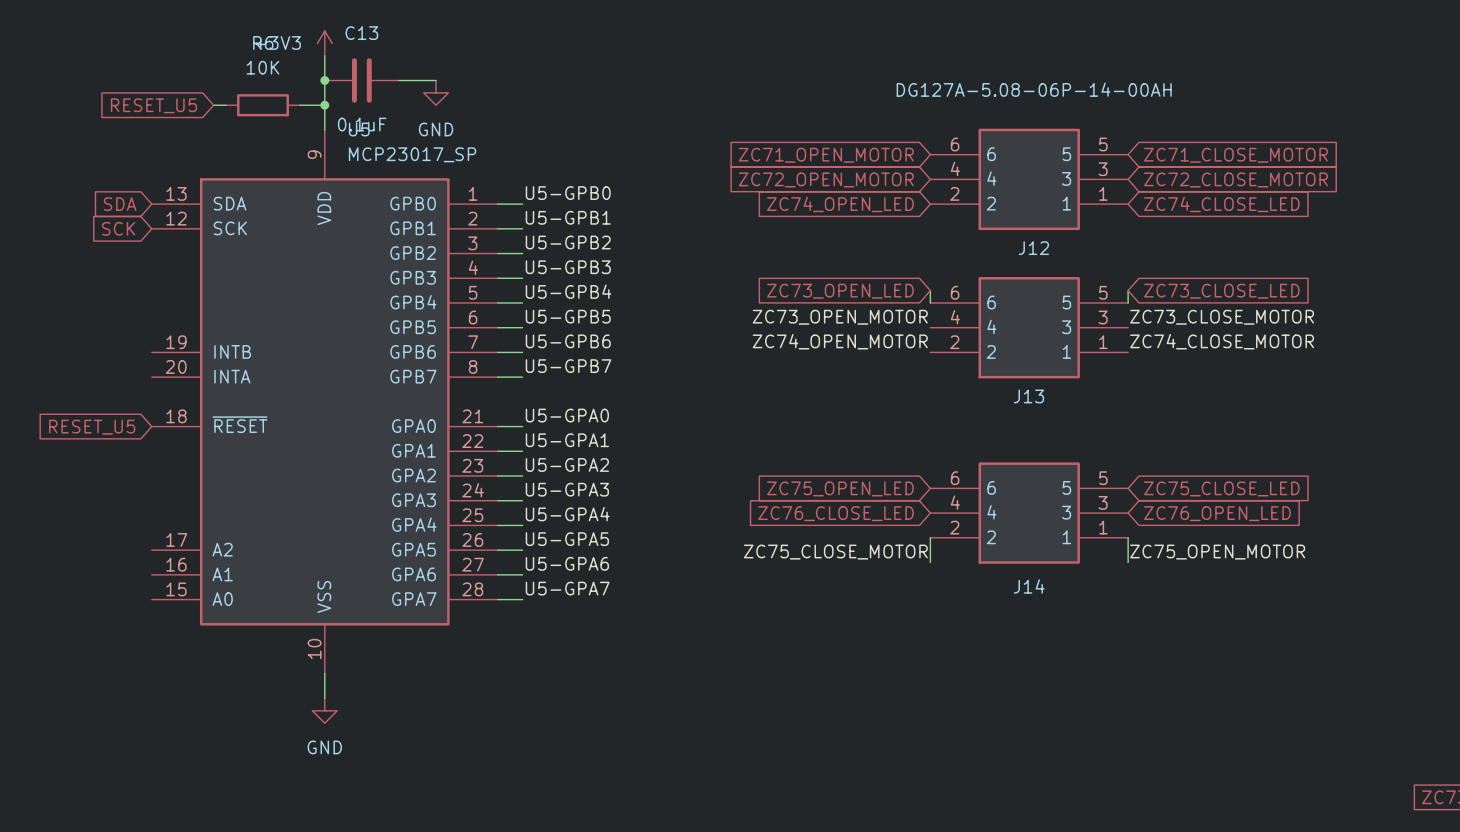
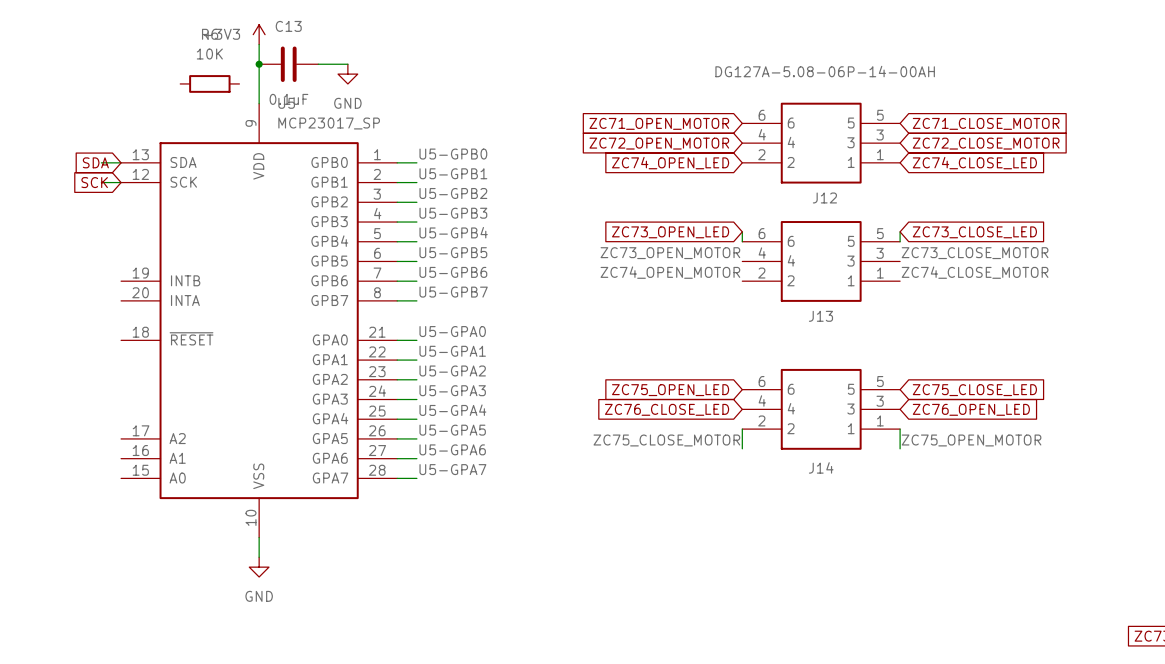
global label: RESET_U5 (153, 105) -> none
wire: (213, 105) (225, 105) -> none
wire: (300, 105) (324, 105) -> (101, 162) (121, 162)
junction: (324, 105) -> none
wire: none -> (101, 182) (121, 182)
global label: RESET_U5 (92, 427) -> none

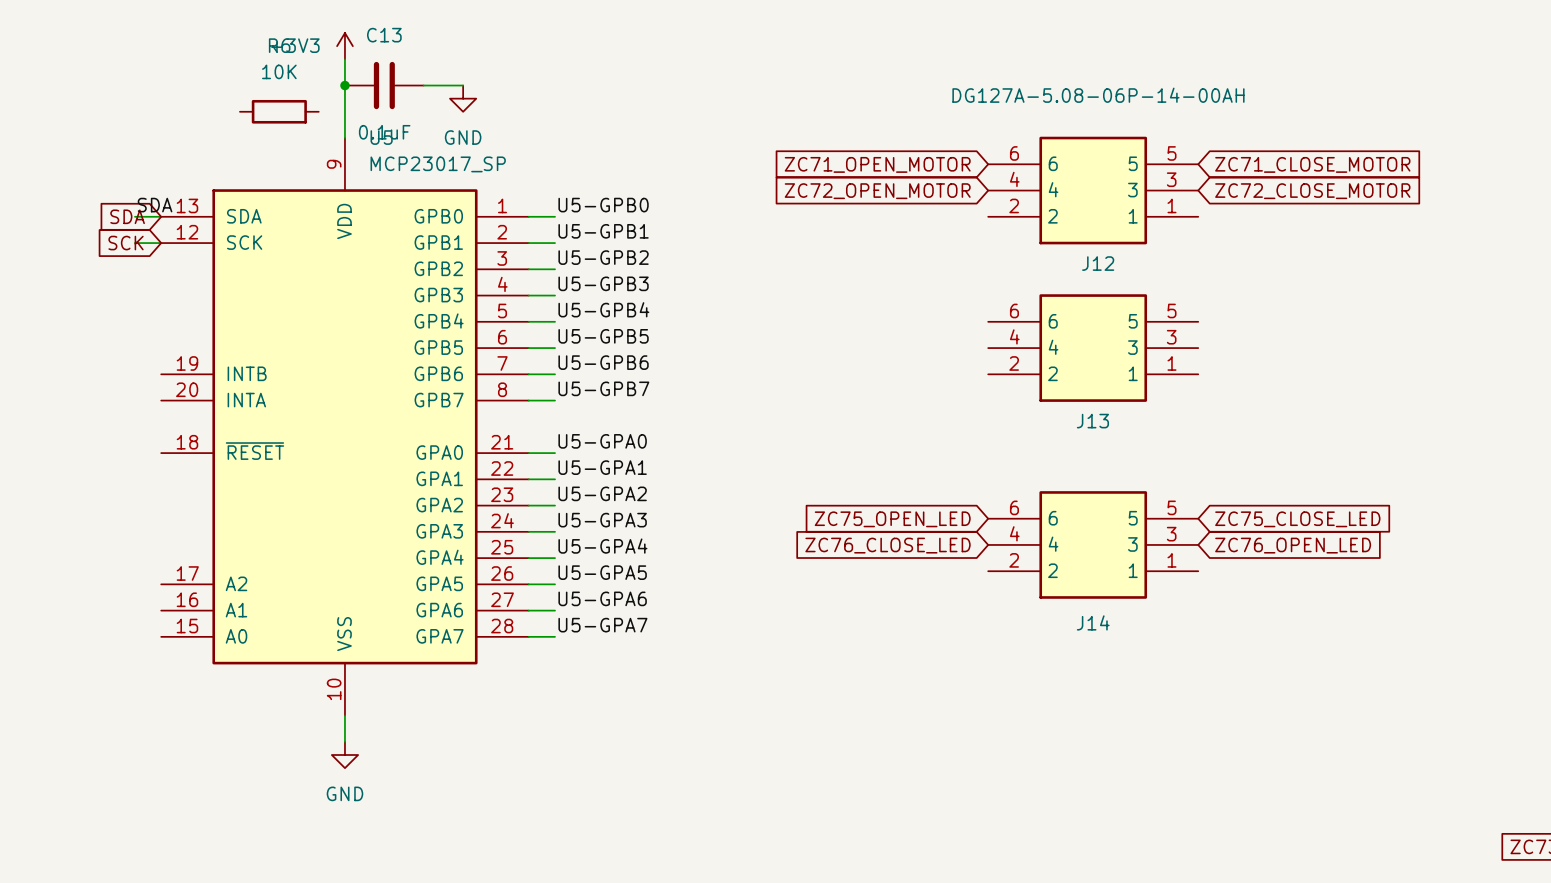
label: none -> SDA (155, 205)
global label: ZC74_OPEN_LED (670, 163) -> none
global label: ZC74_CLOSE_LED (974, 163) -> none
wire: (742, 231) (742, 241) -> none
wire: (900, 231) (900, 241) -> none
global label: ZC73_OPEN_LED (670, 232) -> none
global label: ZC73_CLOSE_LED (974, 232) -> none
label: ZC73_OPEN_MOTOR (670, 253) -> none
label: ZC73_CLOSE_MOTOR (975, 253) -> none
label: ZC74_OPEN_MOTOR (670, 272) -> none
label: ZC74_CLOSE_MOTOR (975, 272) -> none
wire: (742, 429) (742, 448) -> none
wire: (900, 429) (900, 448) -> none
label: ZC75_CLOSE_MOTOR (666, 440) -> none
label: ZC75_OPEN_MOTOR (971, 440) -> none

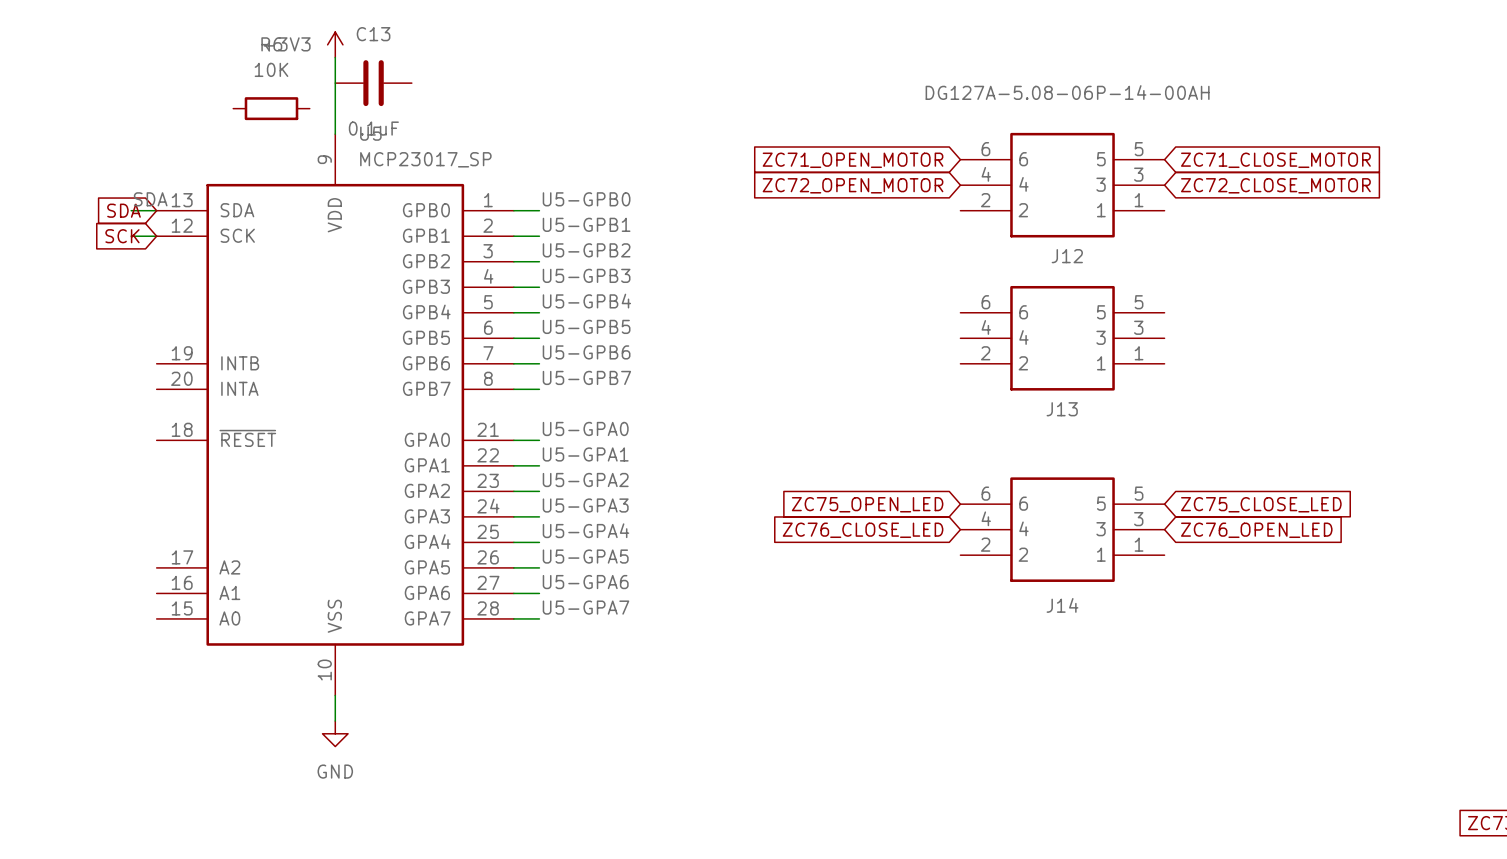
junction: (344, 85) -> none
wire: (423, 85) (463, 85) -> none
power symbol: GND (463, 98) -> none

